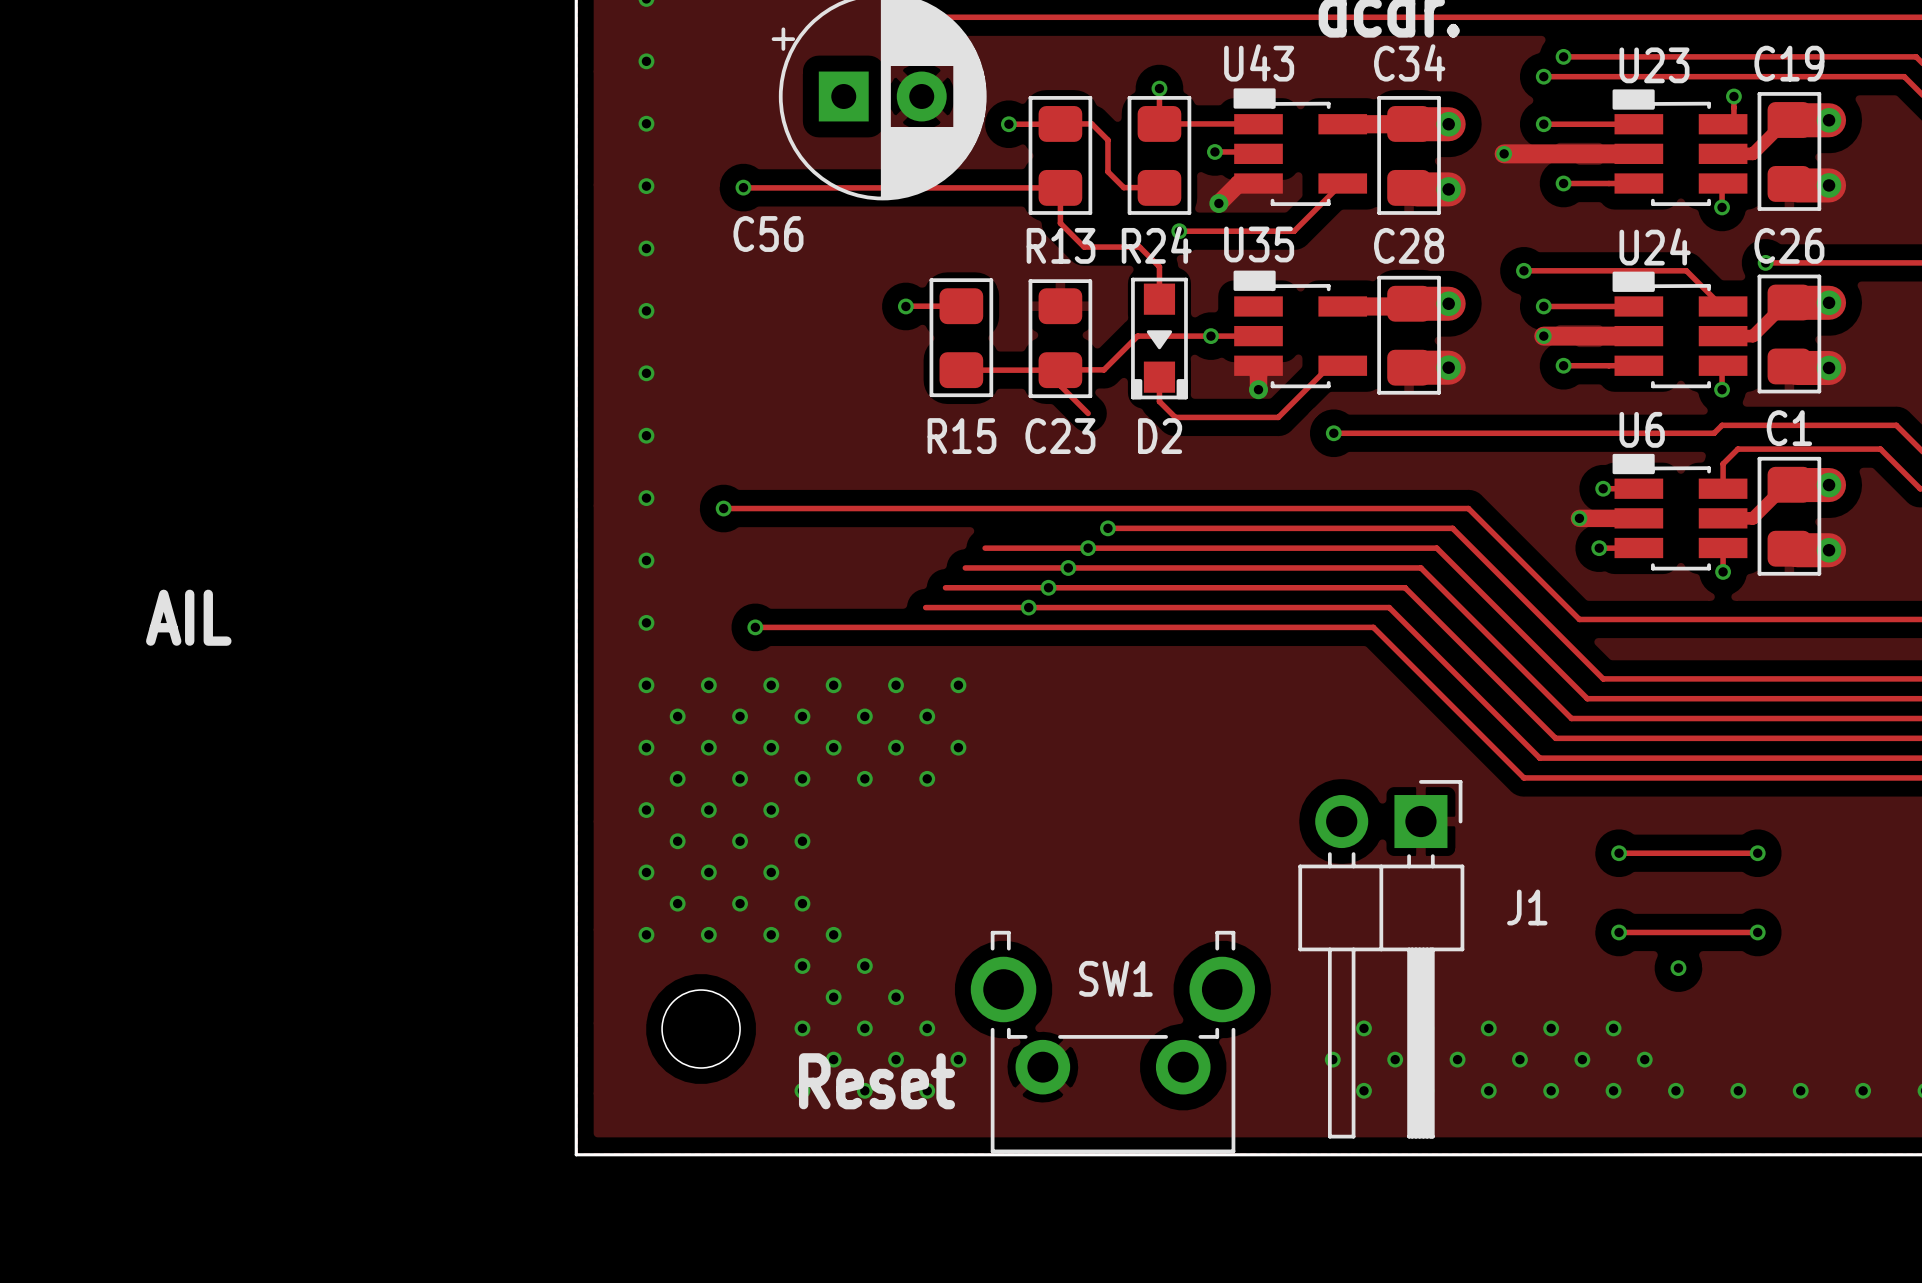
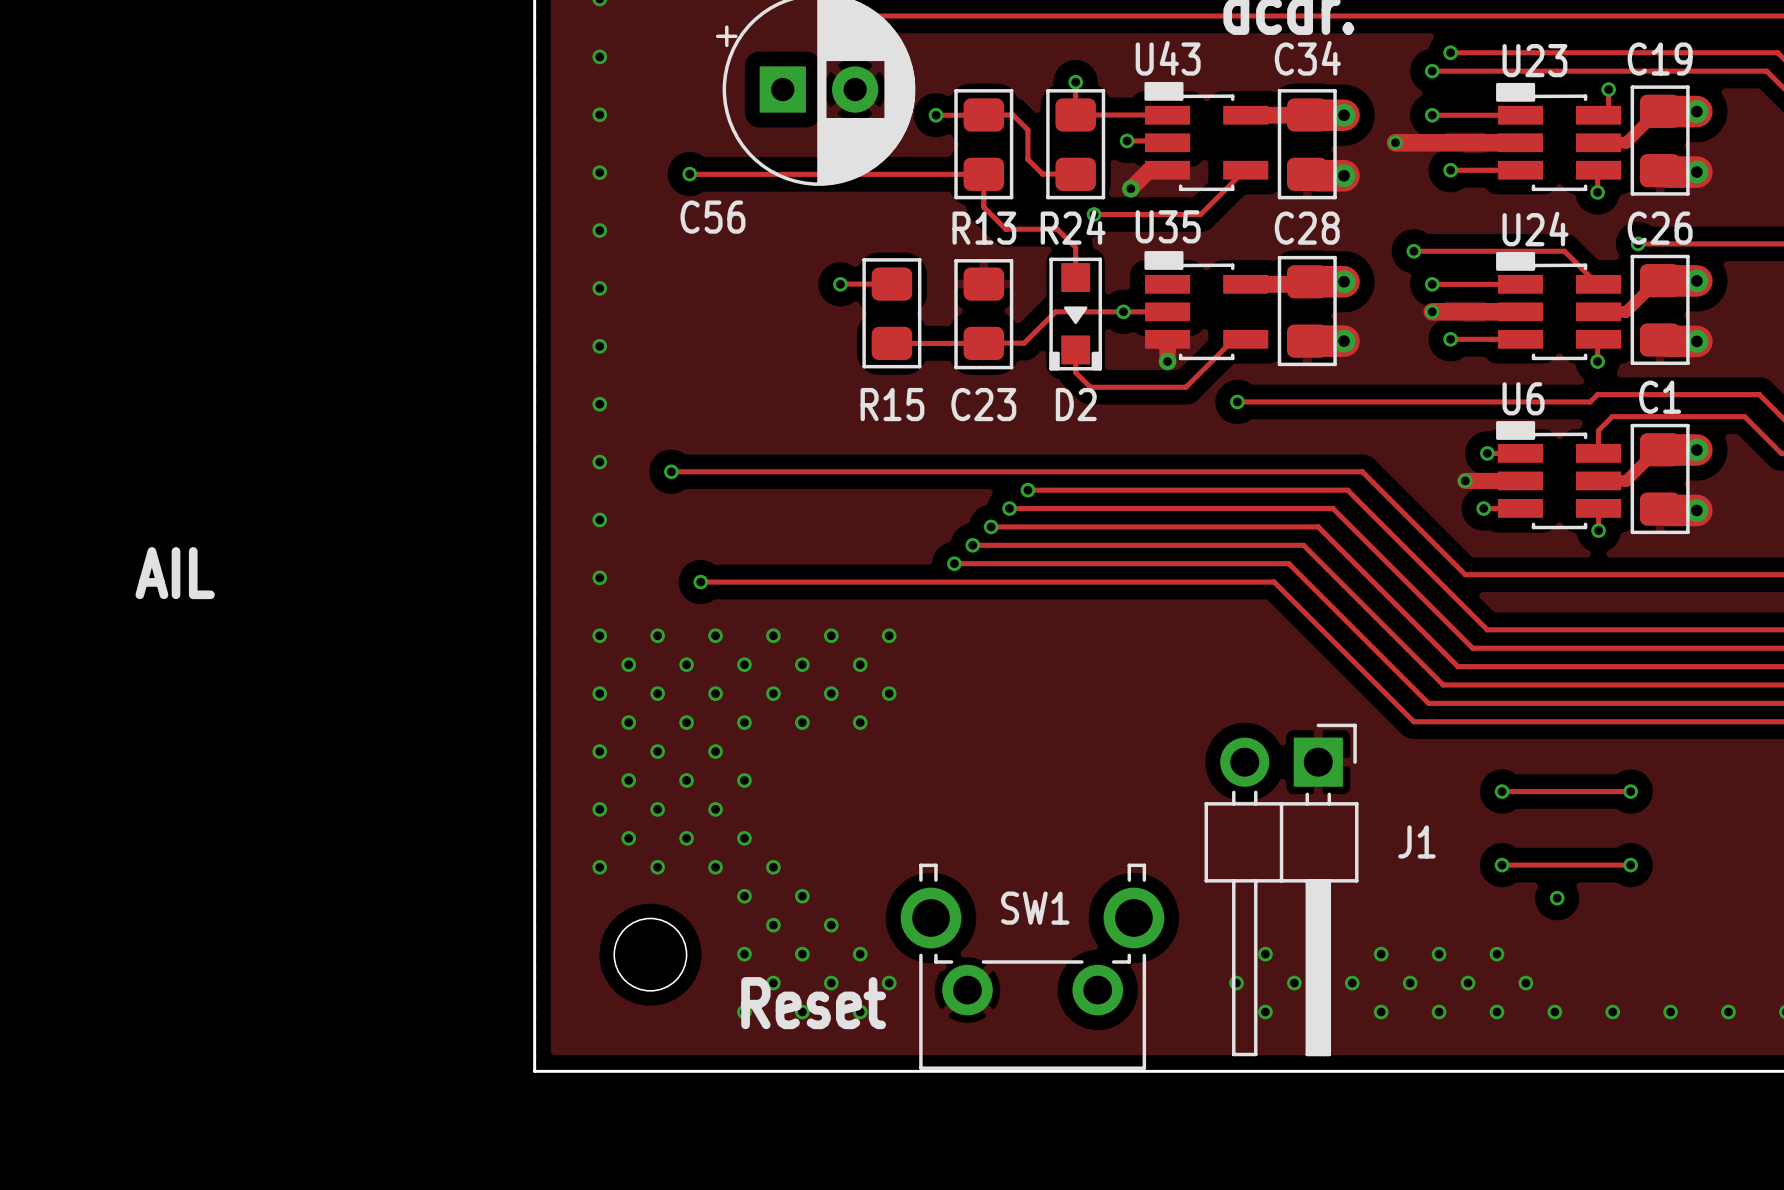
track: (1060, 385) (1088, 413) -> none
track: (985, 548) (1088, 548) -> none
track: (965, 567) (1068, 567) -> none
track: (945, 587) (1048, 587) -> none
track: (925, 607) (1028, 607) -> none

